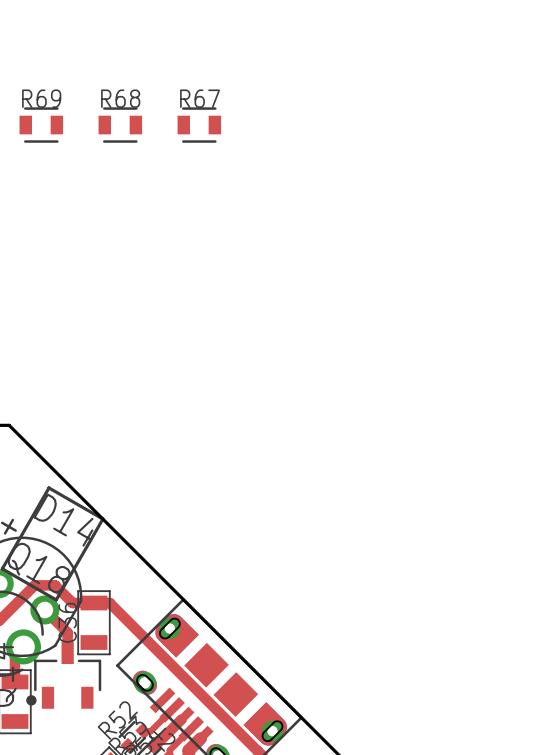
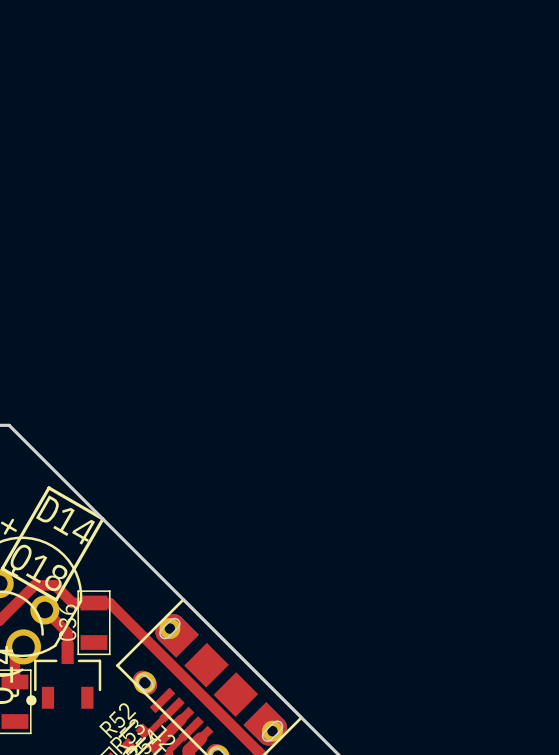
R69: (41, 125) -> none
R68: (120, 125) -> none
R67: (199, 125) -> none

